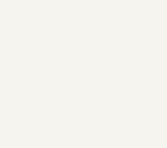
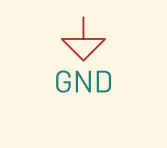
power symbol: none -> GND (83, 39)

